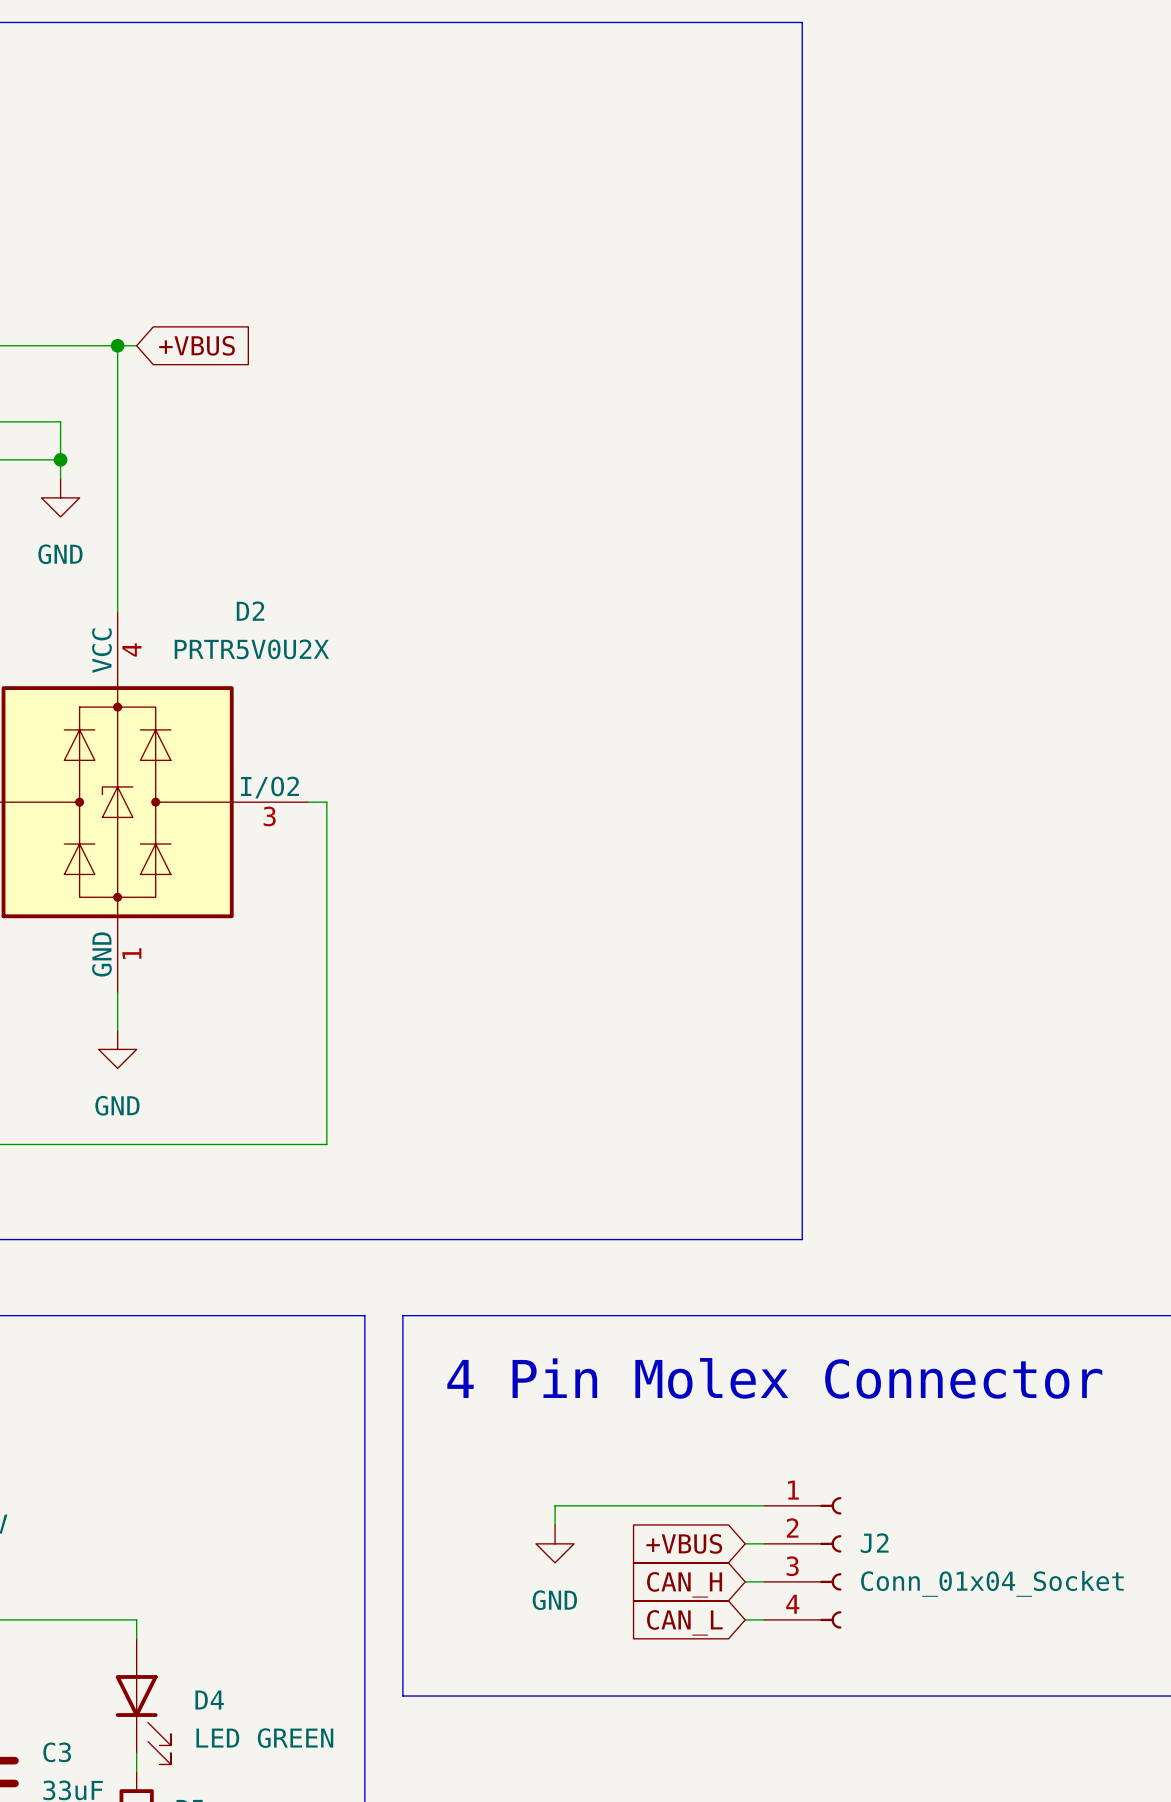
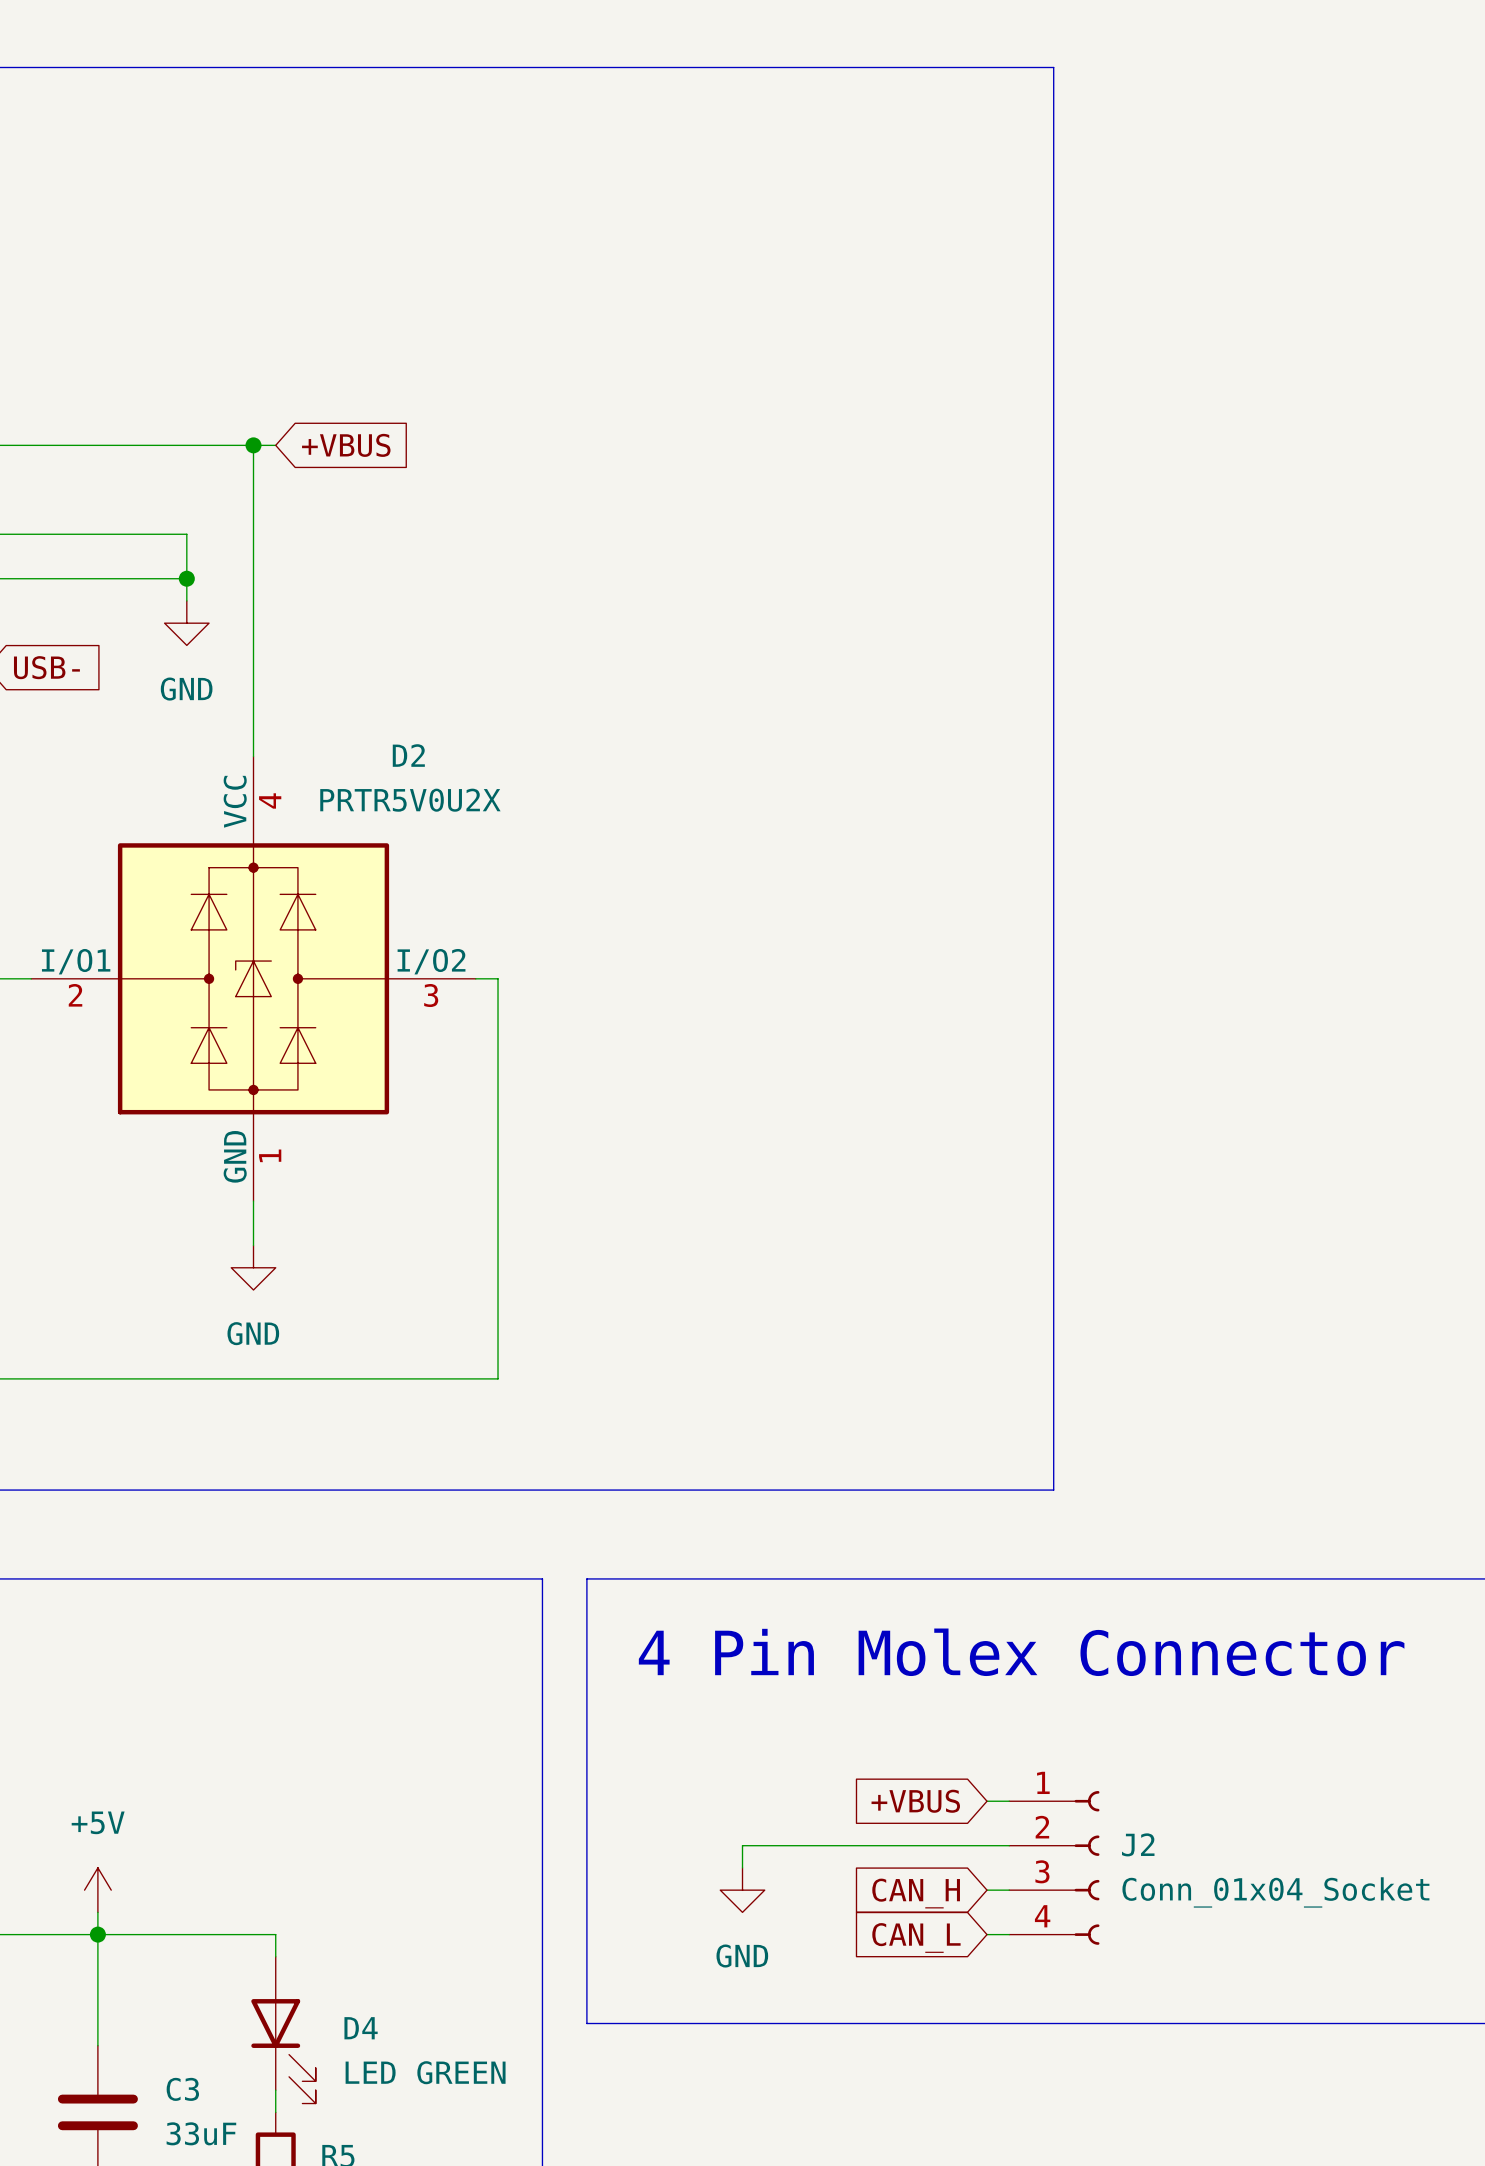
wire: (745, 1505) (555, 1505) (555, 1524) -> none
power symbol position: GND (555, 1543) -> GND (742, 1890)
global label position: +VBUS (684, 1543) -> +VBUS (915, 1801)
wire: none -> (987, 1845) (742, 1845) (742, 1867)

